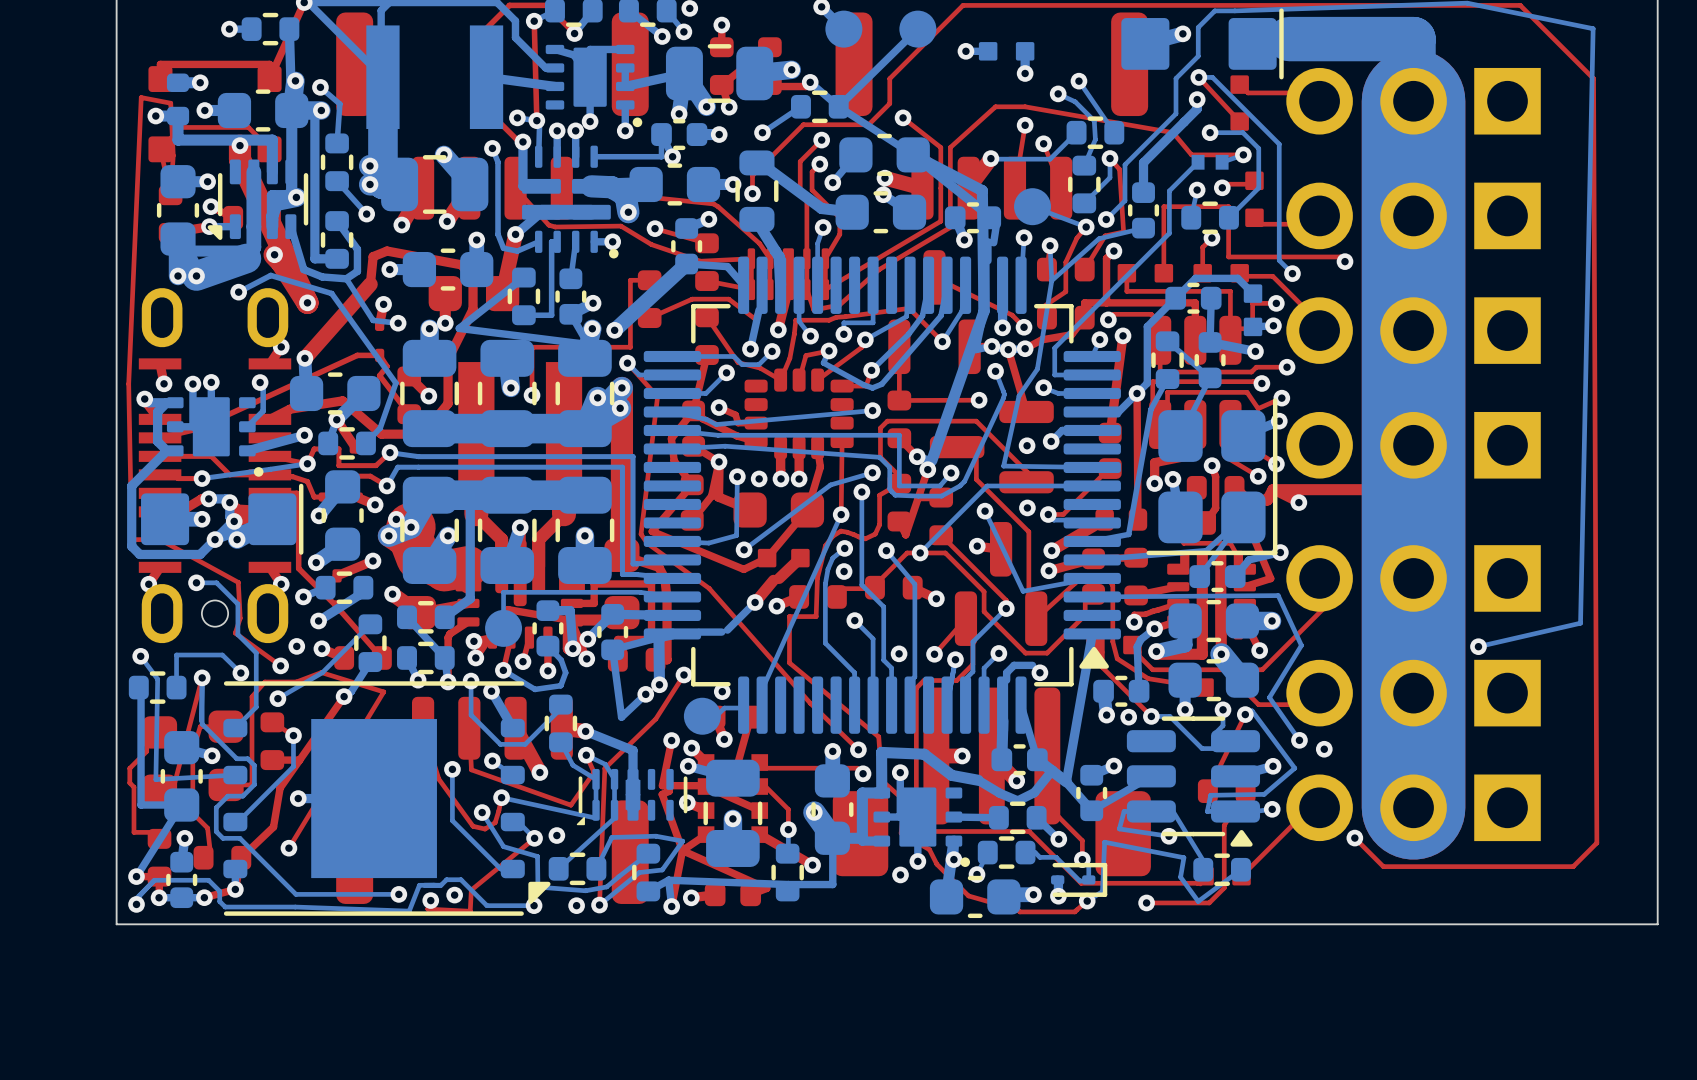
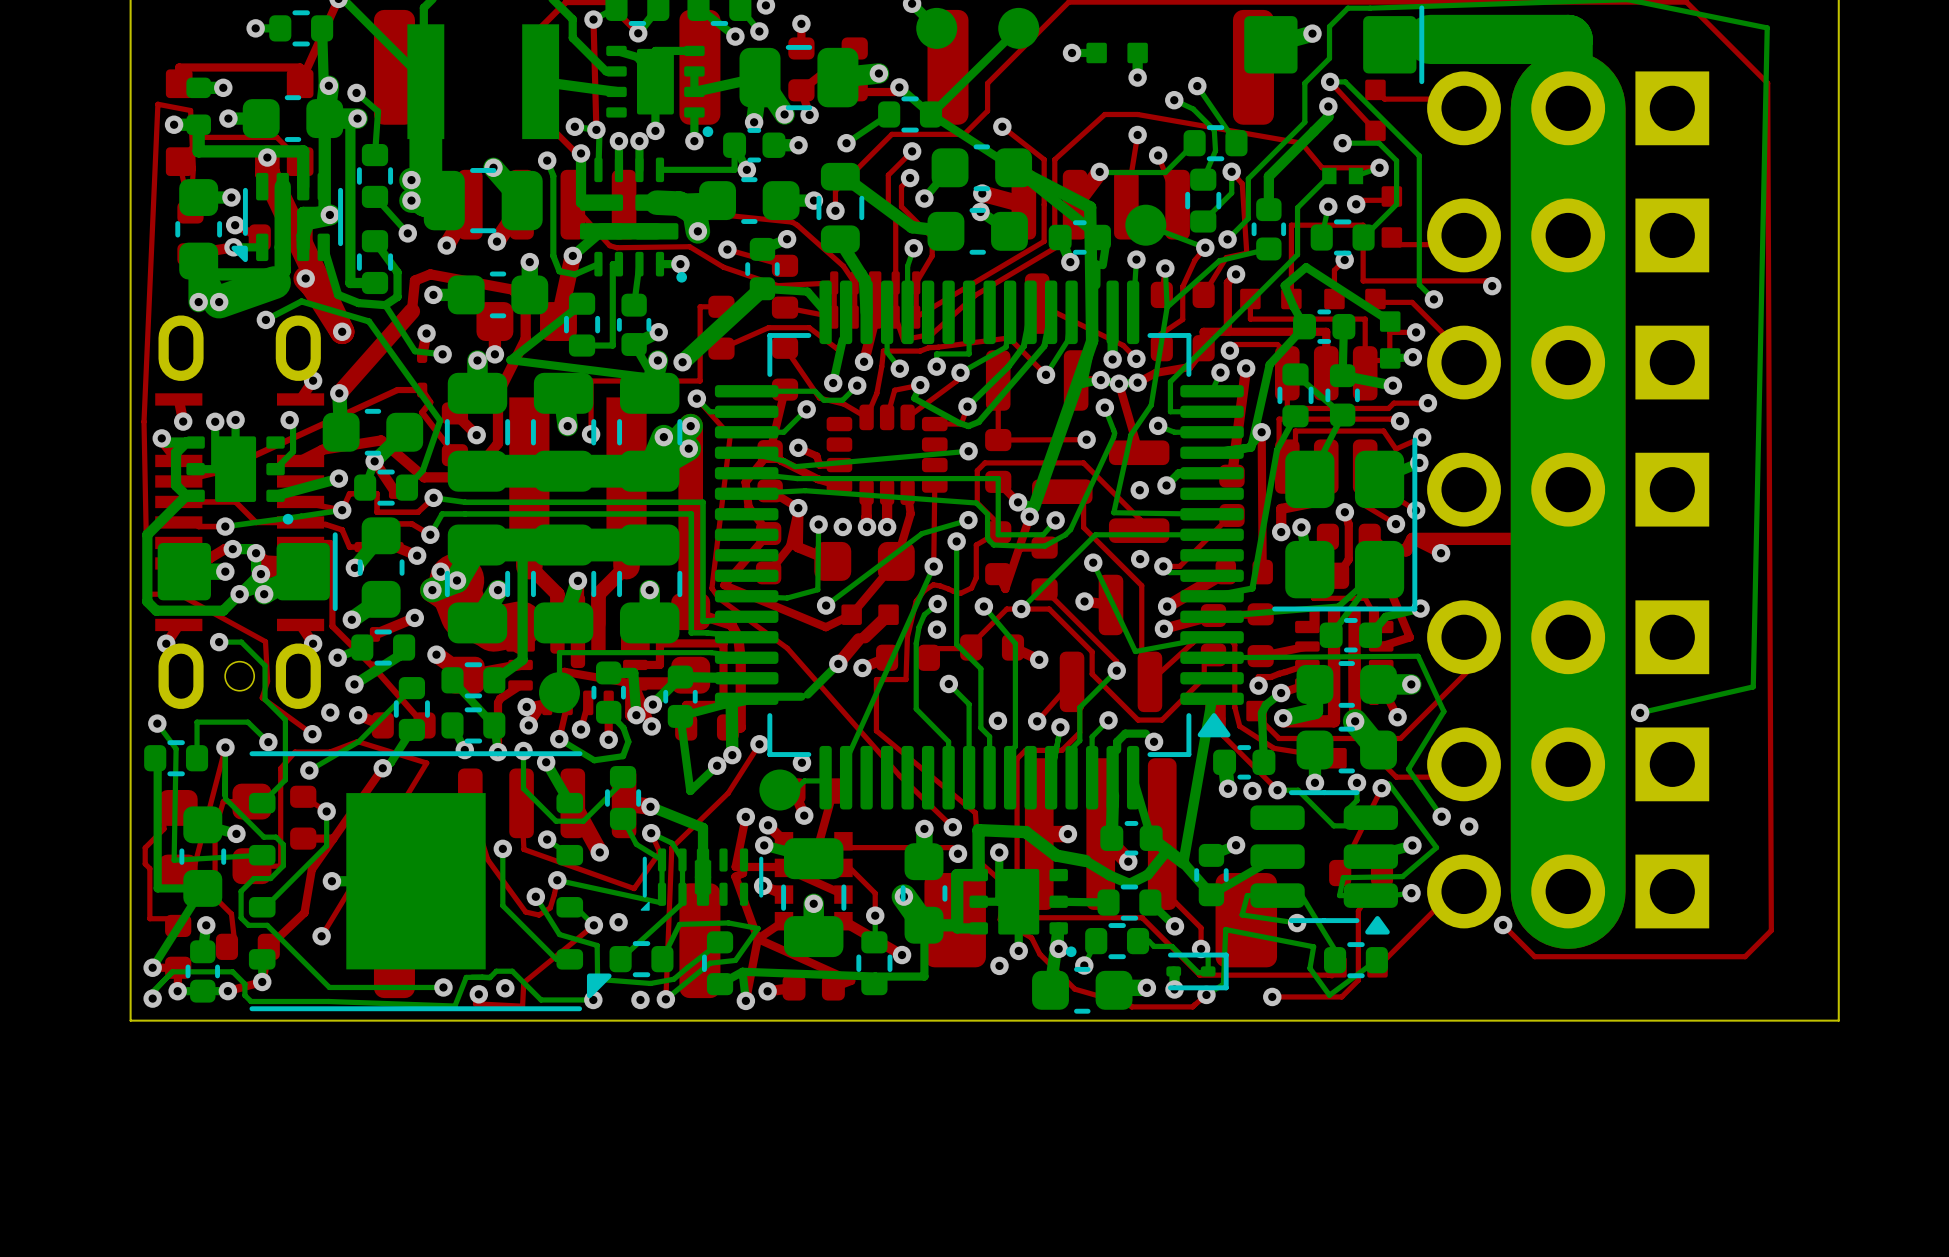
bottom track: (1253, 293) (1237, 278) (1195, 278) (1147, 326) (1147, 383) (1118, 411) (1092, 411) -> (1390, 321) (1306, 267) (1284, 285) (1304, 326) (1269, 364) (1251, 447) (1212, 452) (1249, 447) (1261, 432)

